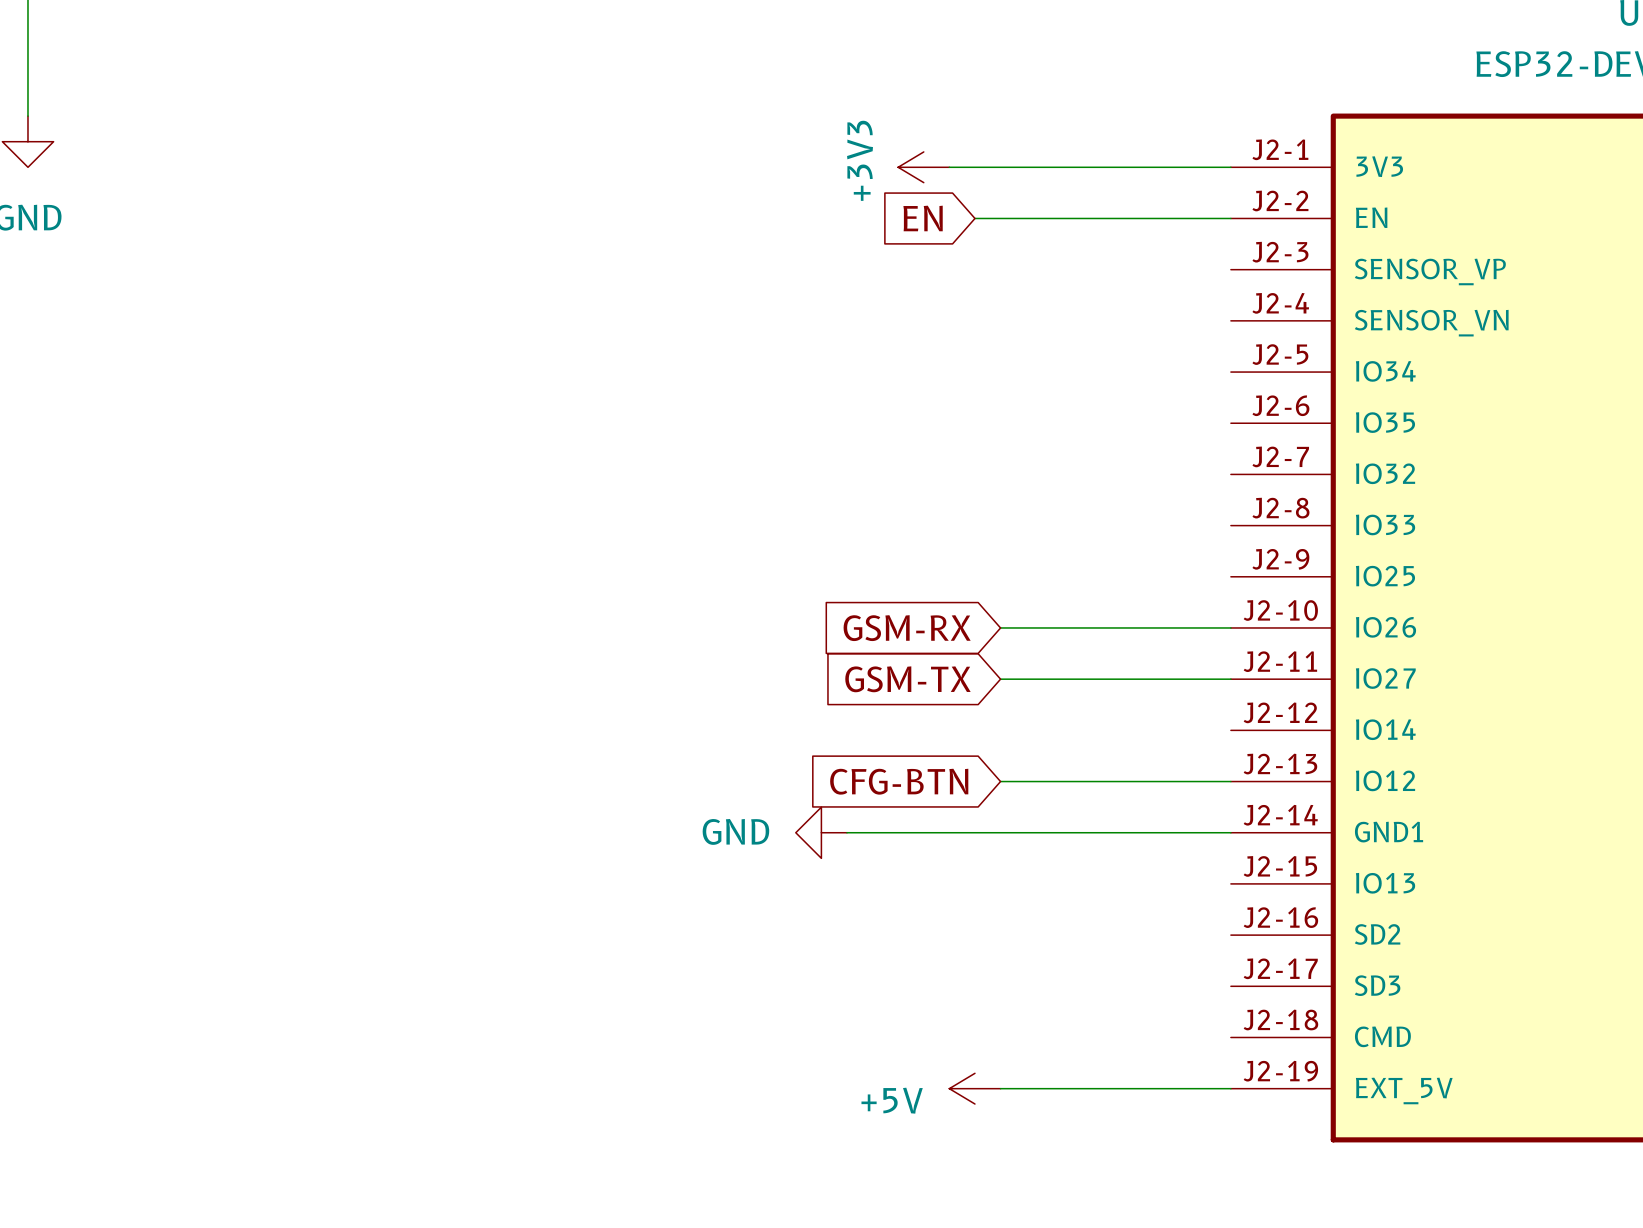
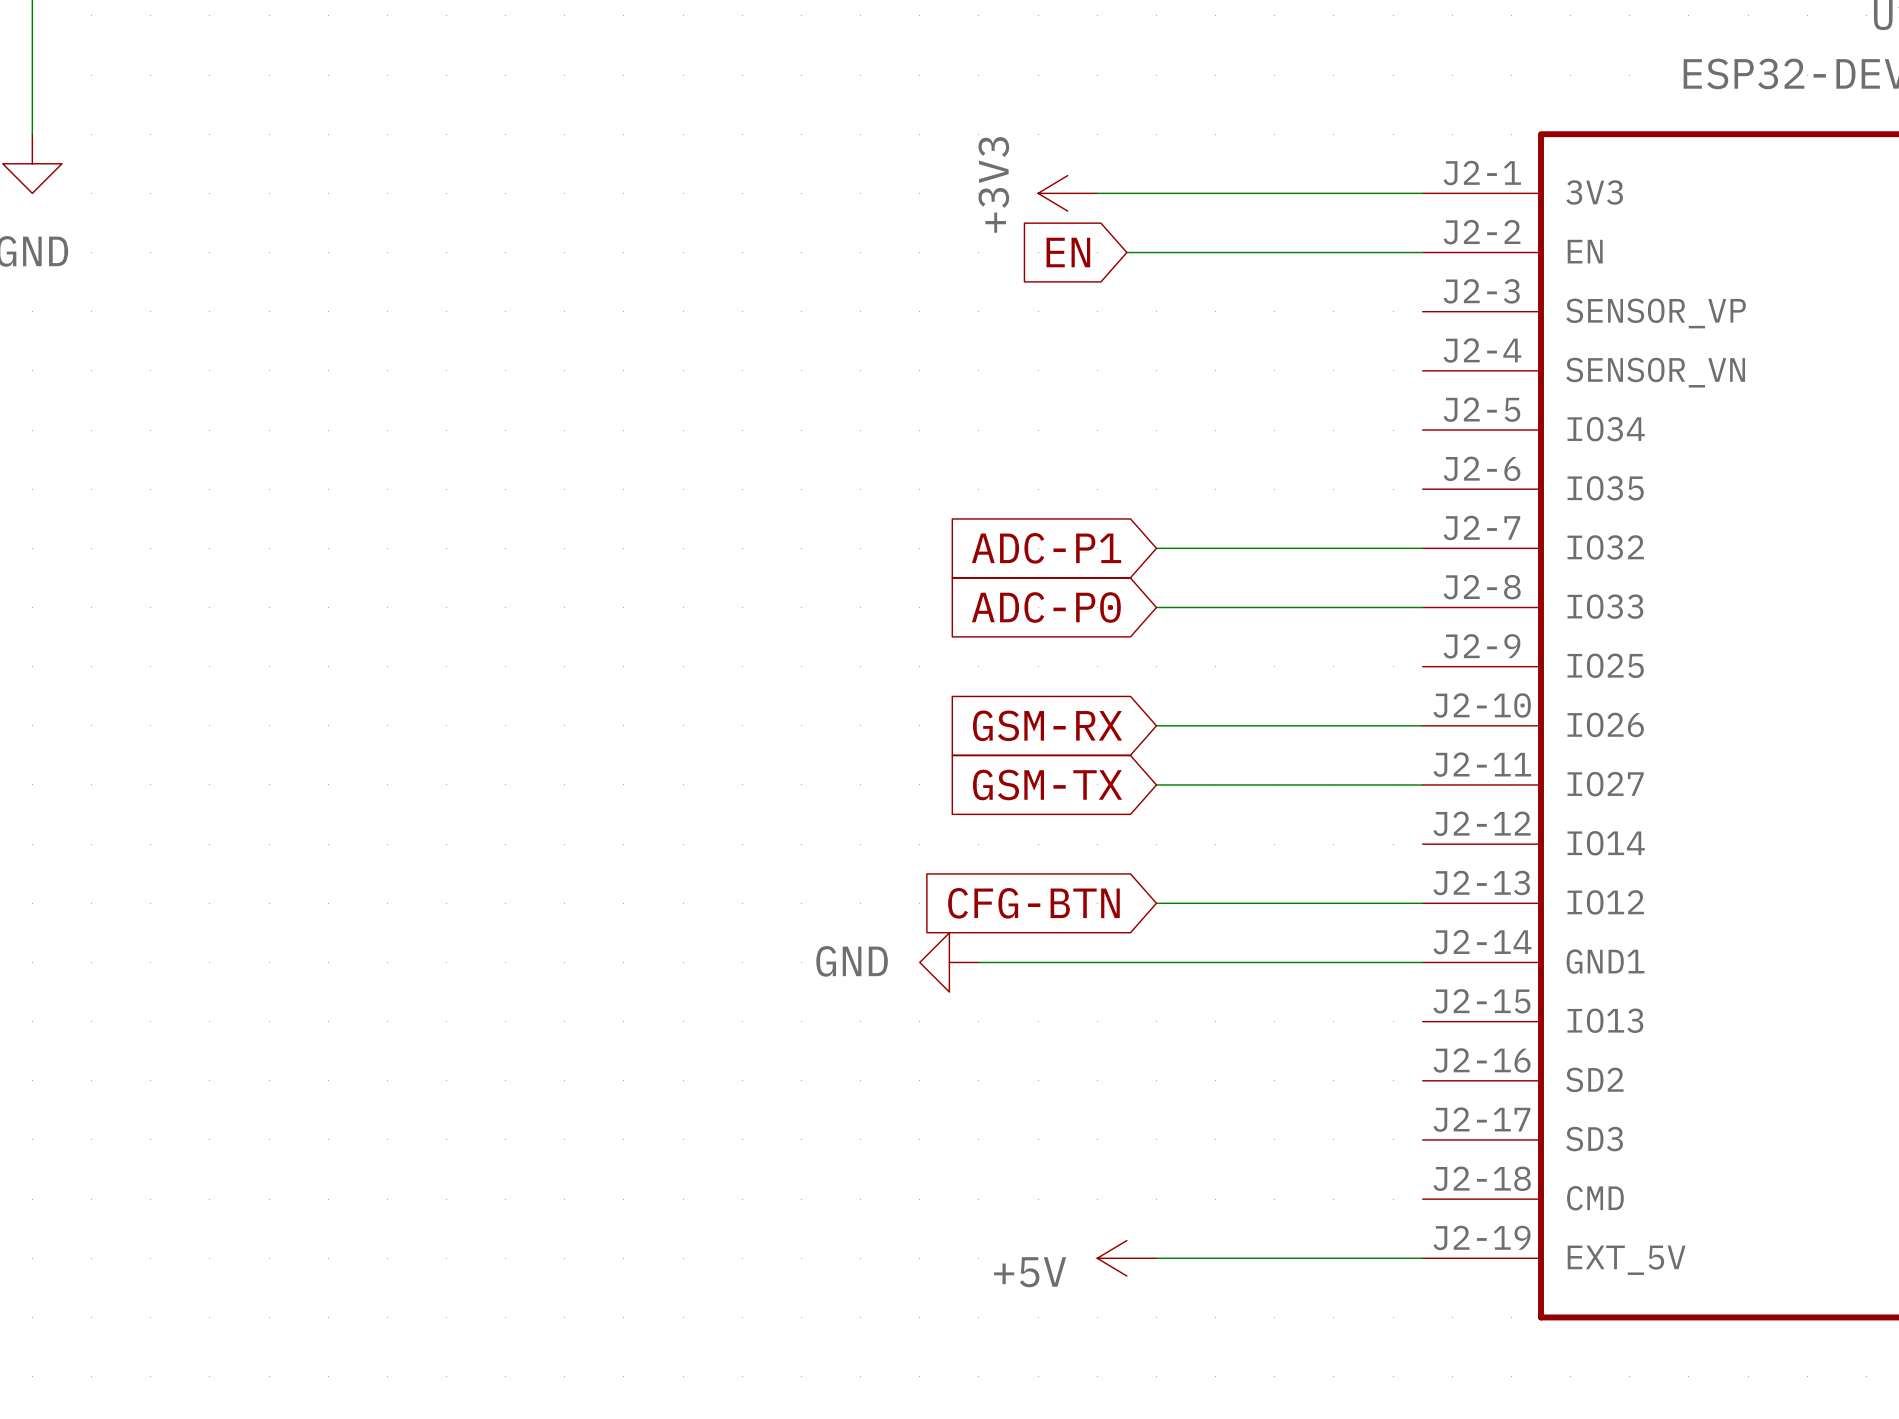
global label: none -> ADC-P1 (1046, 548)
wire: none -> (1156, 548) (1422, 548)
global label: none -> ADC-P0 (1046, 607)
wire: none -> (1156, 607) (1422, 607)

